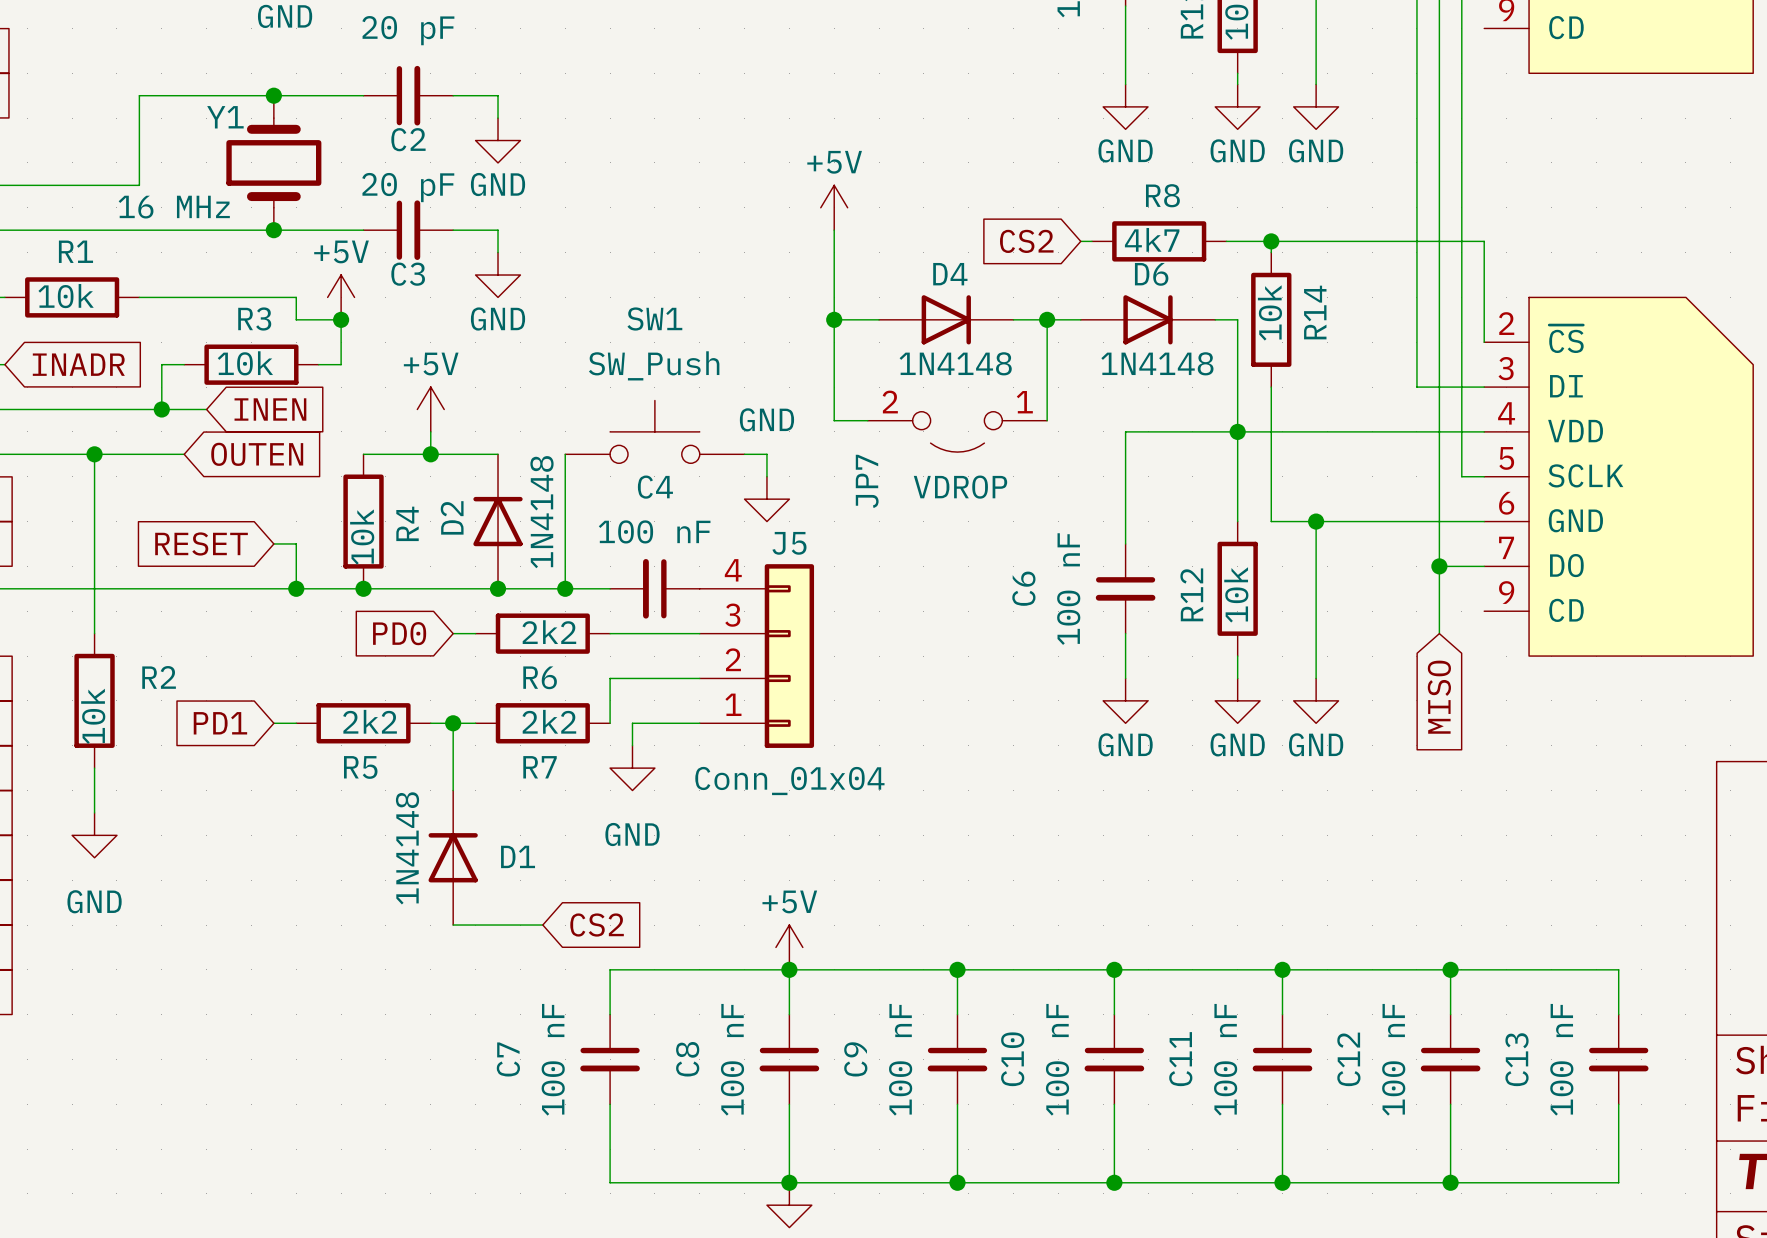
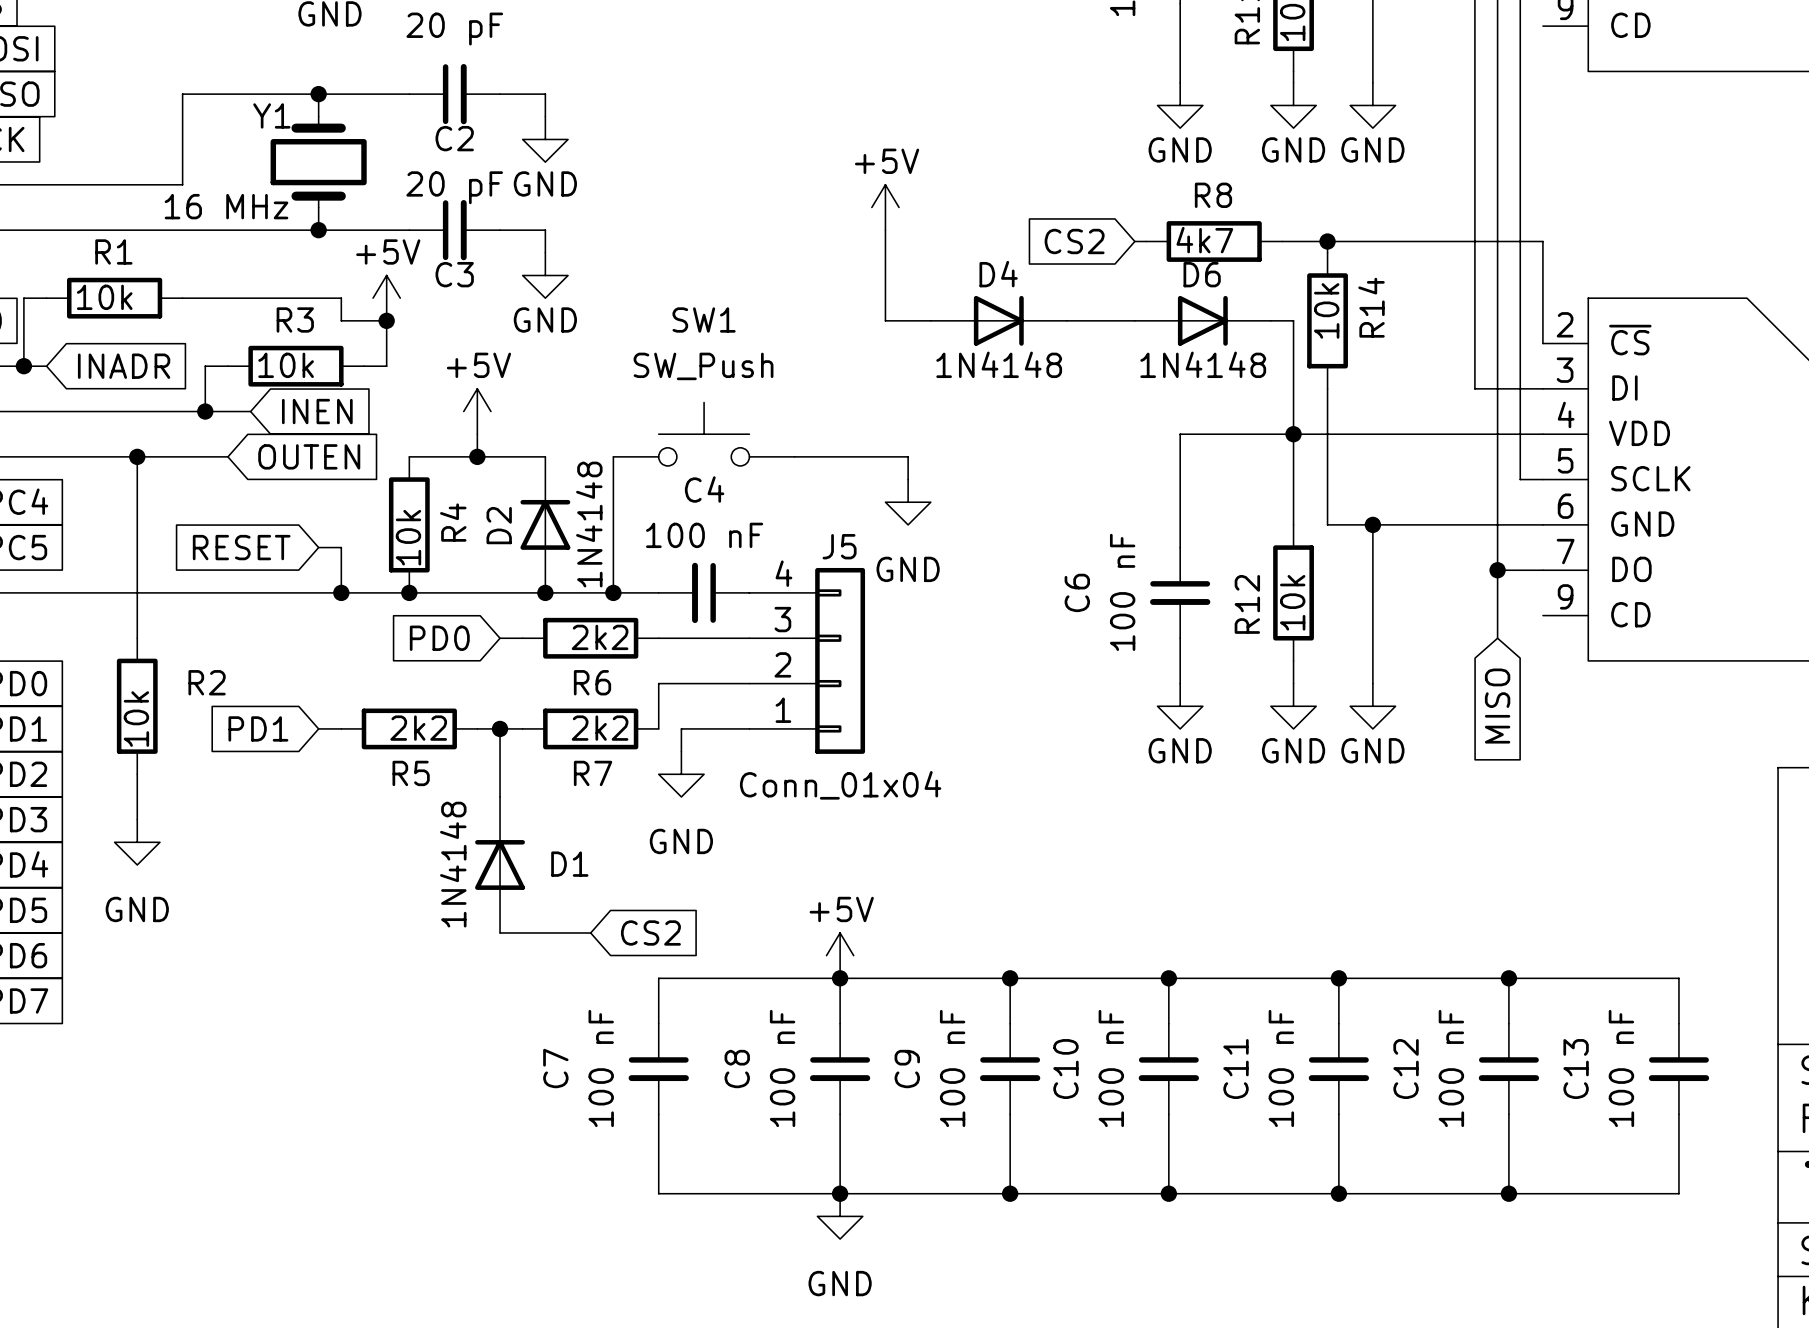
wire: (834, 319) (834, 420) (867, 420) -> none
junction: (834, 319) -> none
wire: (1047, 319) (1047, 420) -> none
junction: (1047, 319) -> none
power symbol text position: GND (766, 419) -> GND (908, 569)
JP7: VDROP (957, 431) -> none
wire: (766, 454) (766, 476) -> (817, 456) (908, 456) (908, 479)
power symbol position: GND (766, 499) -> GND (908, 502)

